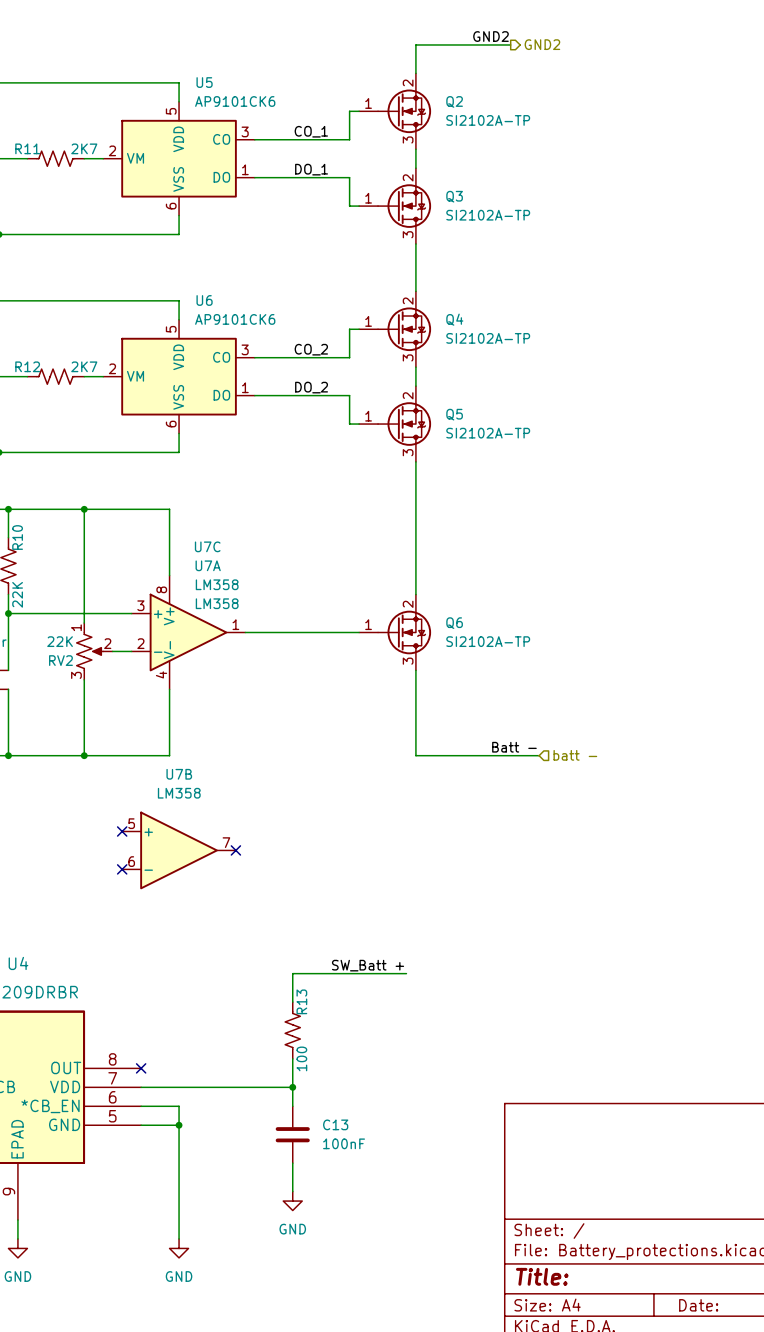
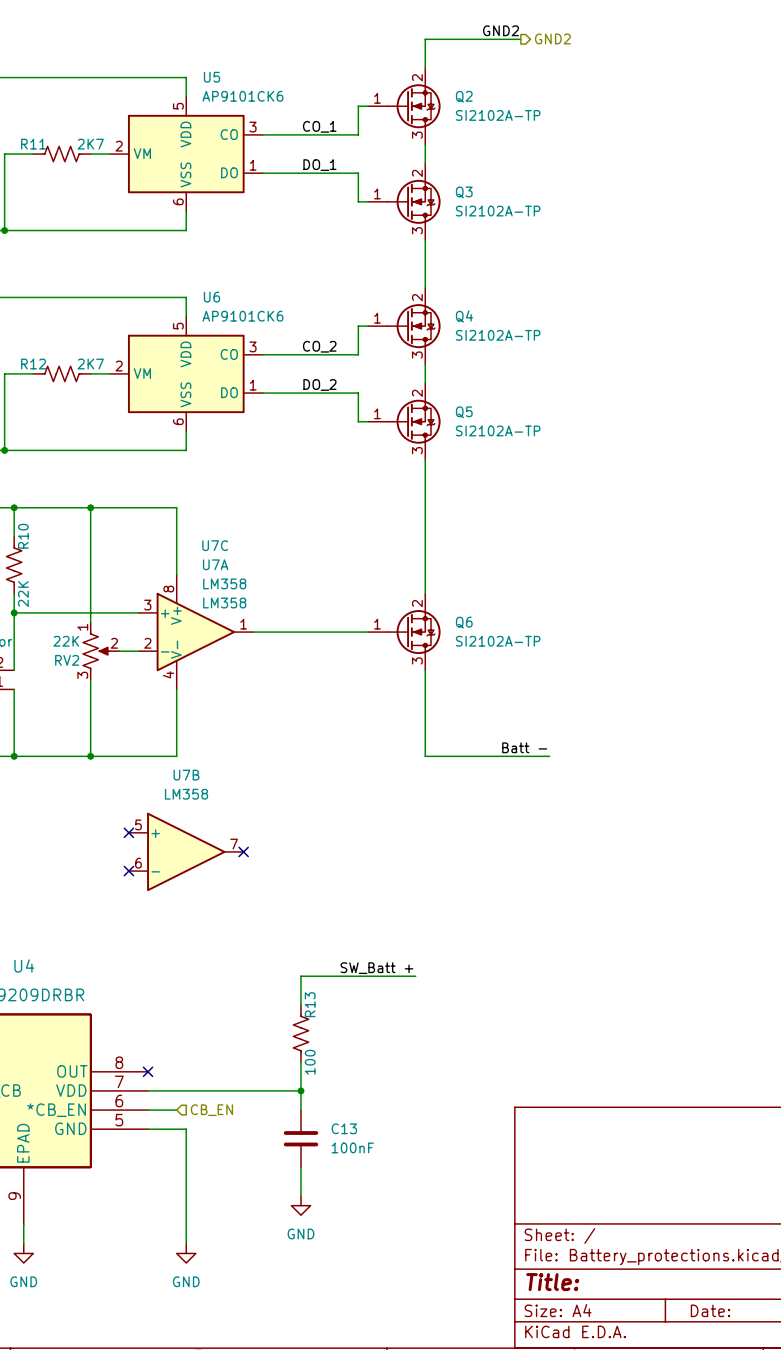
hierarchical label: batt - (575, 755) -> none
wire: (169, 1106) (179, 1106) (179, 1125) -> none
hierarchical label: none -> CB_EN (211, 1110)
junction: (179, 1125) -> none

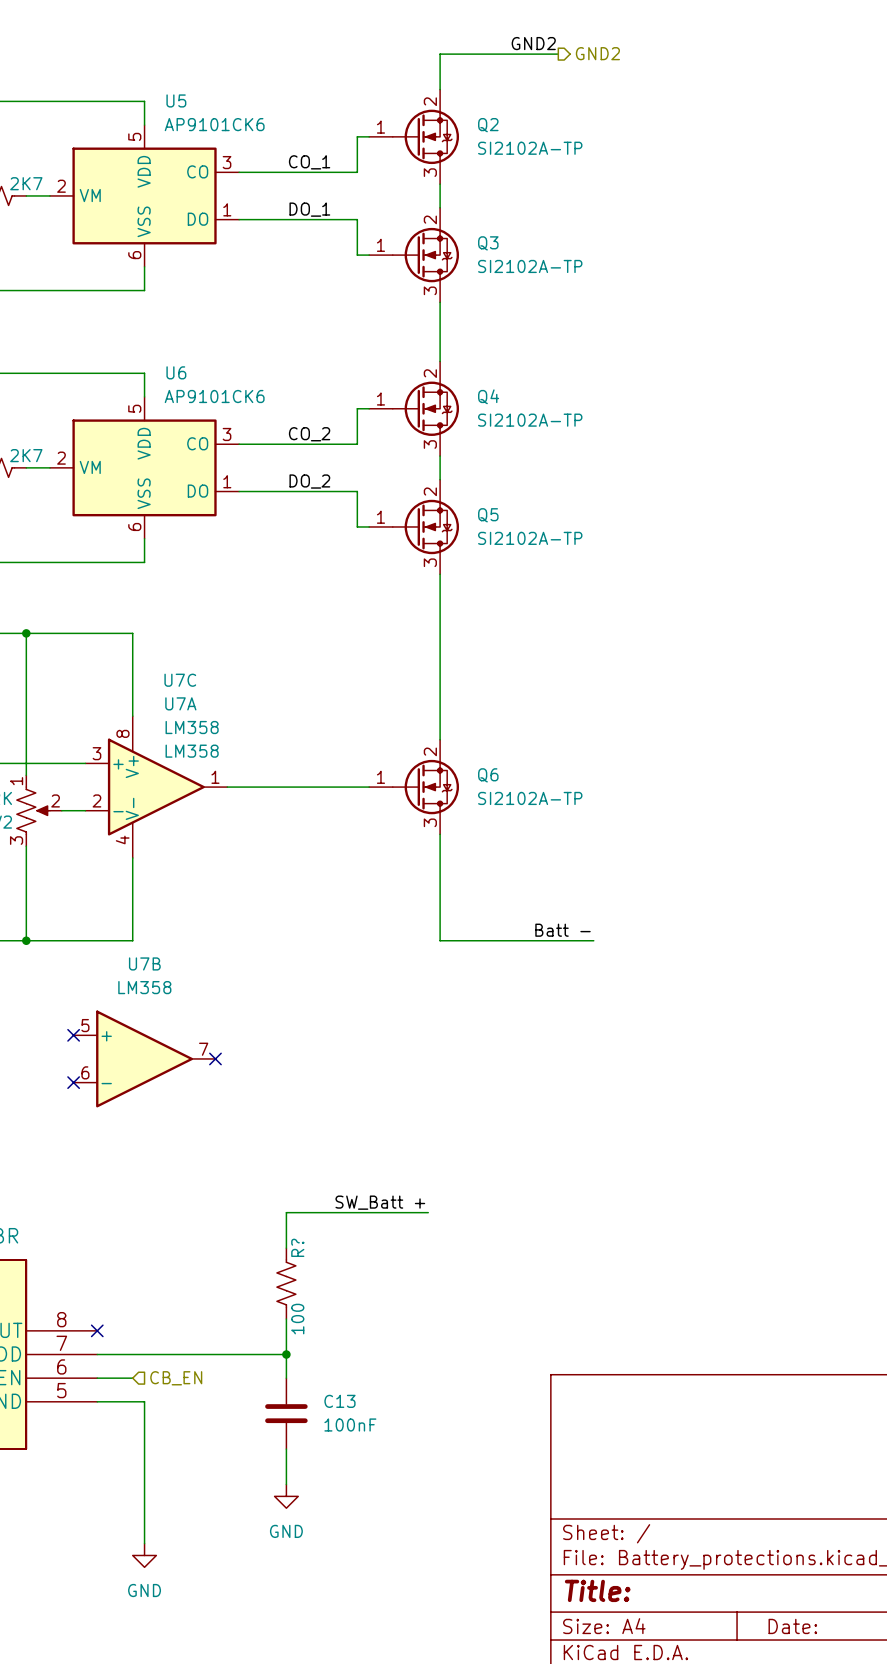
R13 name: R13 (310, 1004) -> R? (297, 1247)

